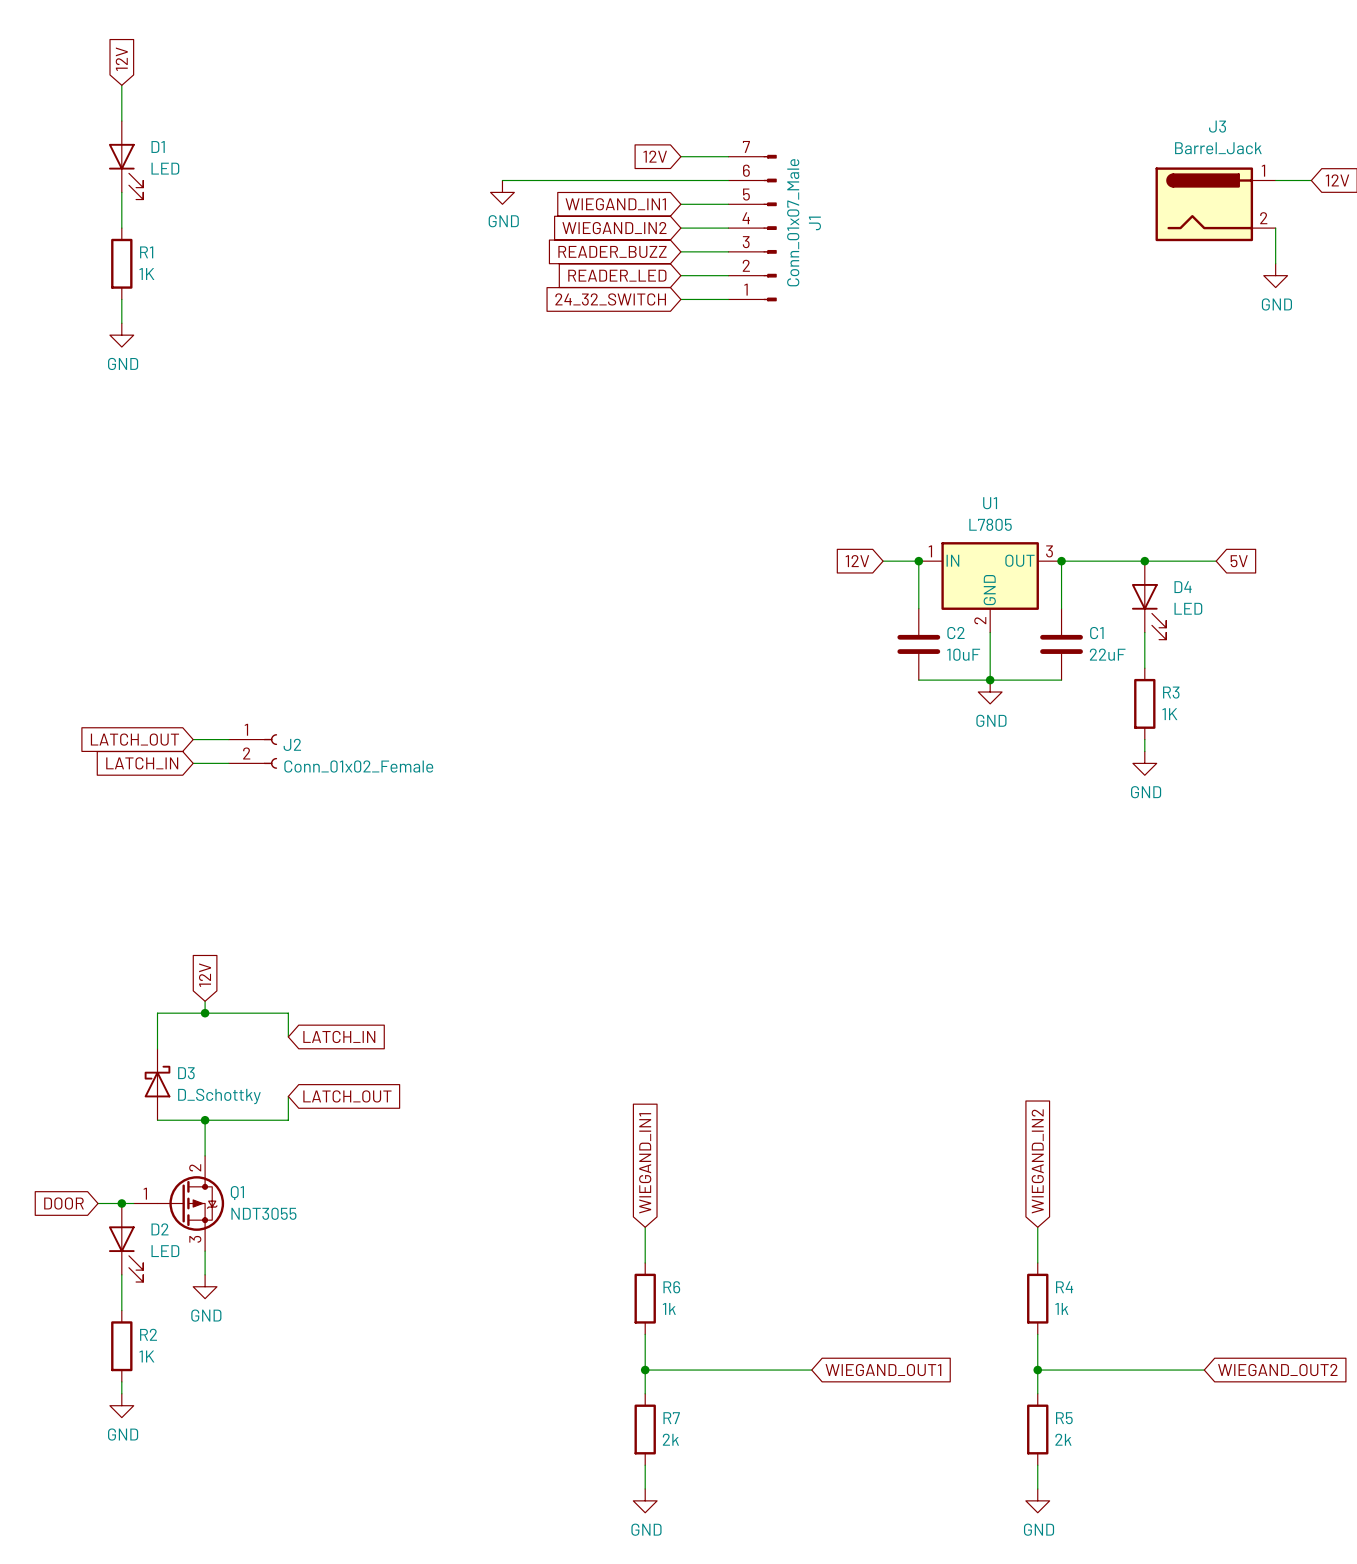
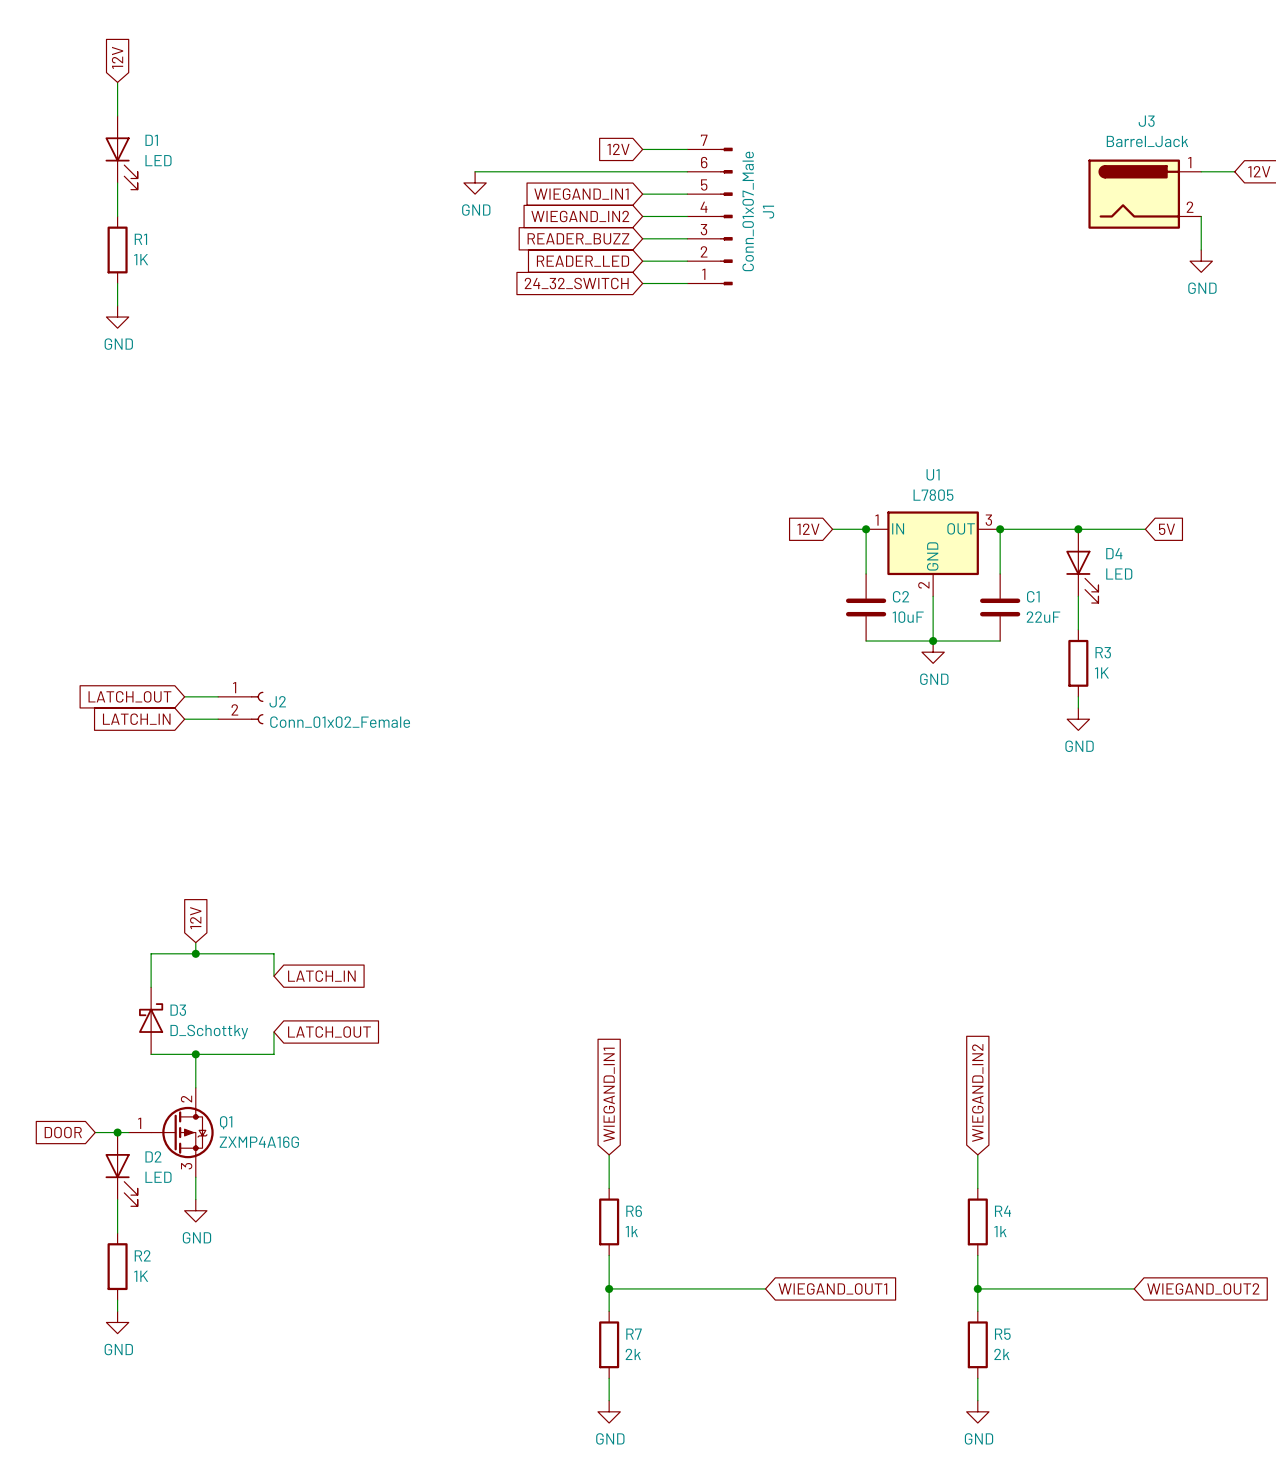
Q1 value: NDT3055 (263, 1213) -> ZXMP4A16G (259, 1142)

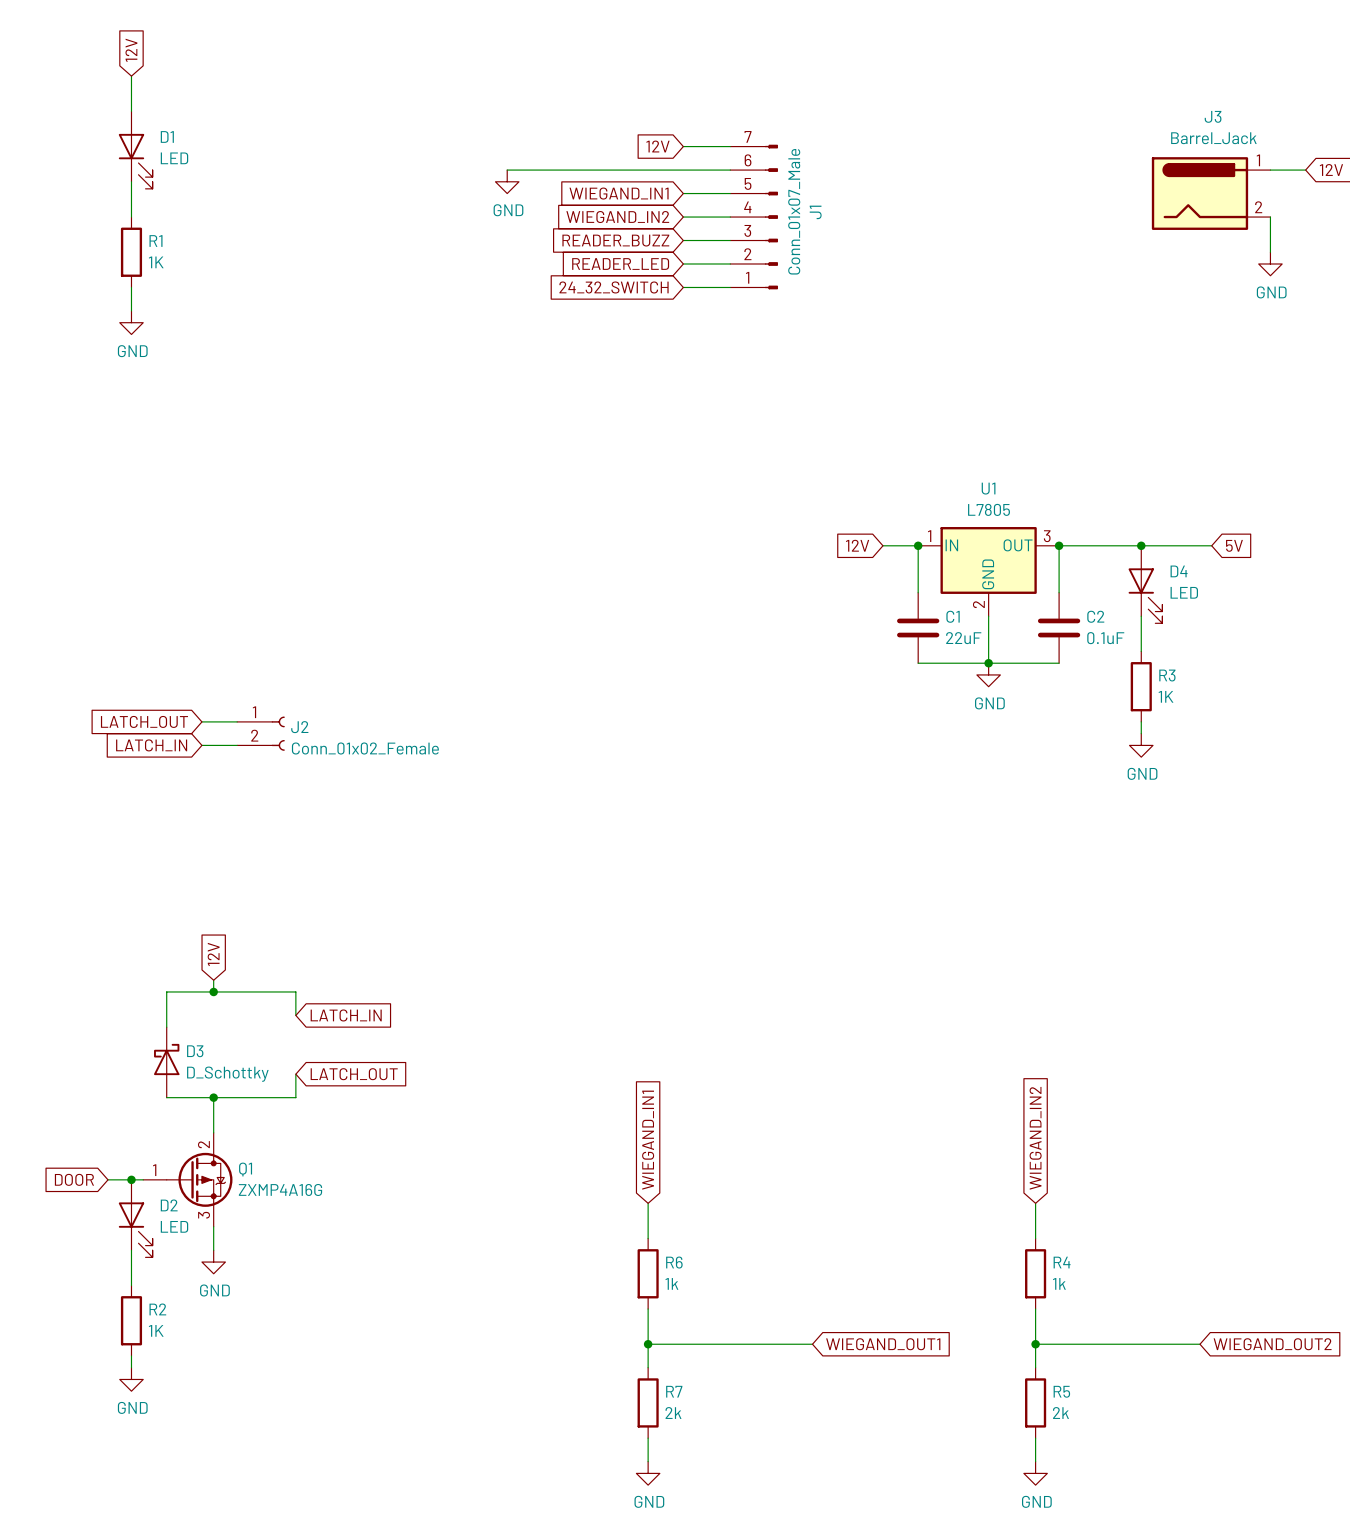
C2 name: C2 (901, 596) -> C1 (953, 616)
C1 name: C1 (1033, 596) -> C2 (1095, 616)
C2 value: 10uF (908, 617) -> 22uF (963, 638)
C1 value: 22uF (1043, 617) -> 0.1uF (1105, 638)

